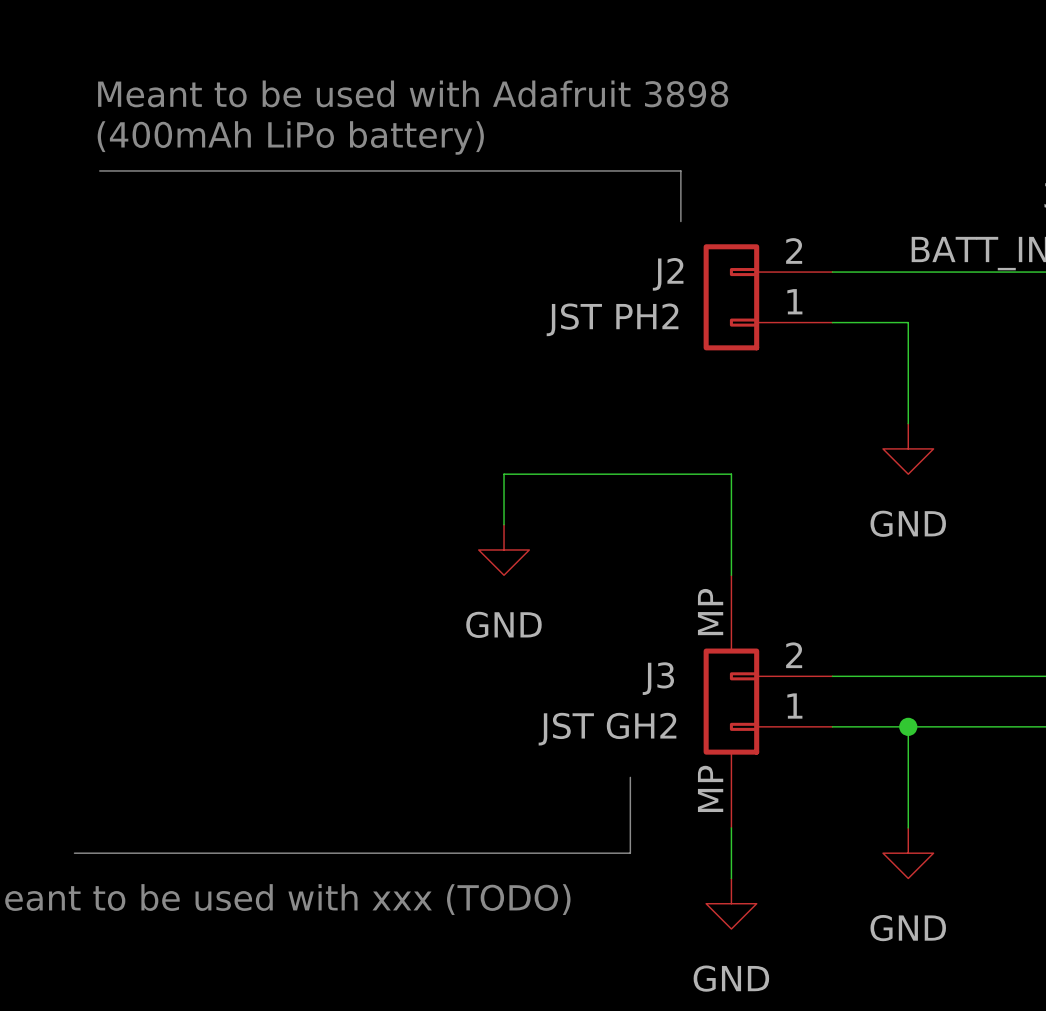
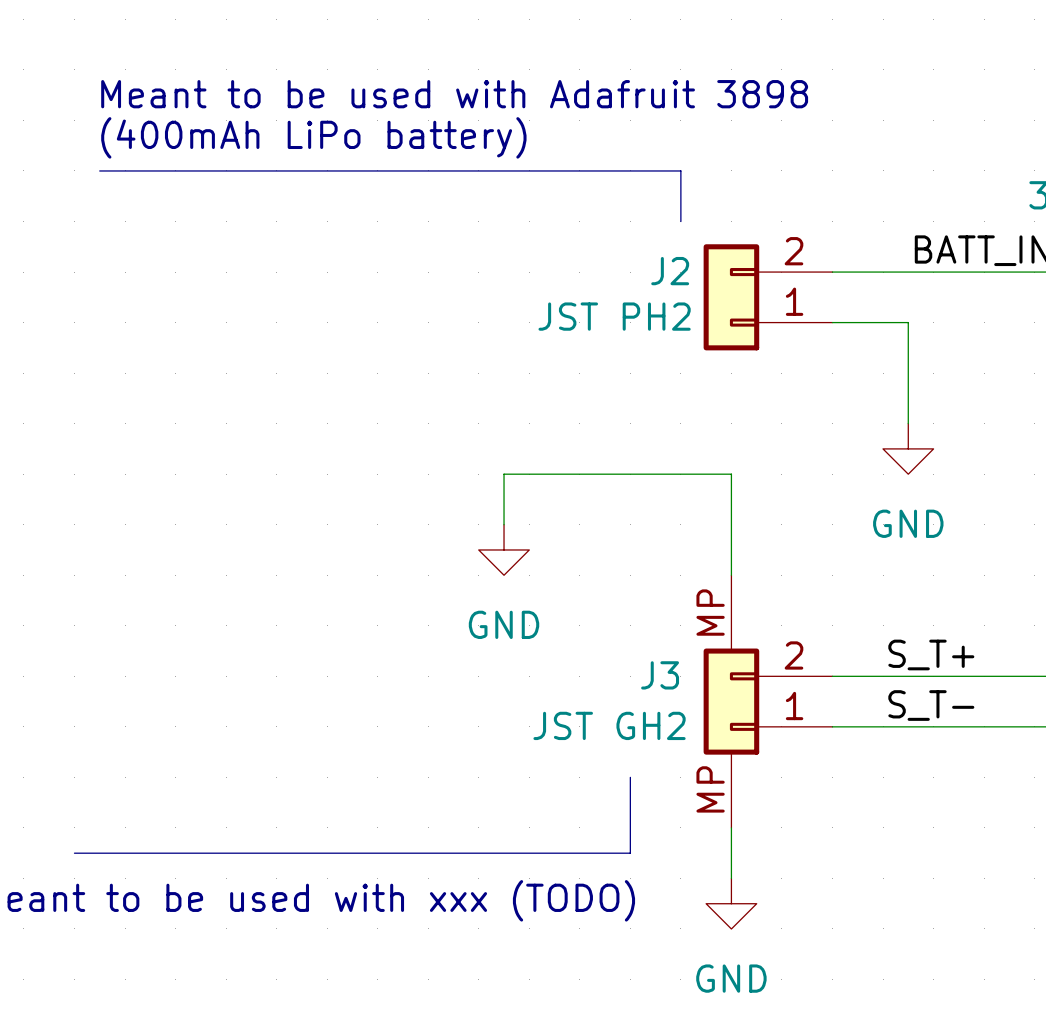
label: none -> S_T+ (931, 654)
label: none -> S_T- (931, 705)
wire: (908, 726) (908, 827) -> none
junction: (908, 726) -> none
power symbol: GND (908, 853) -> none

